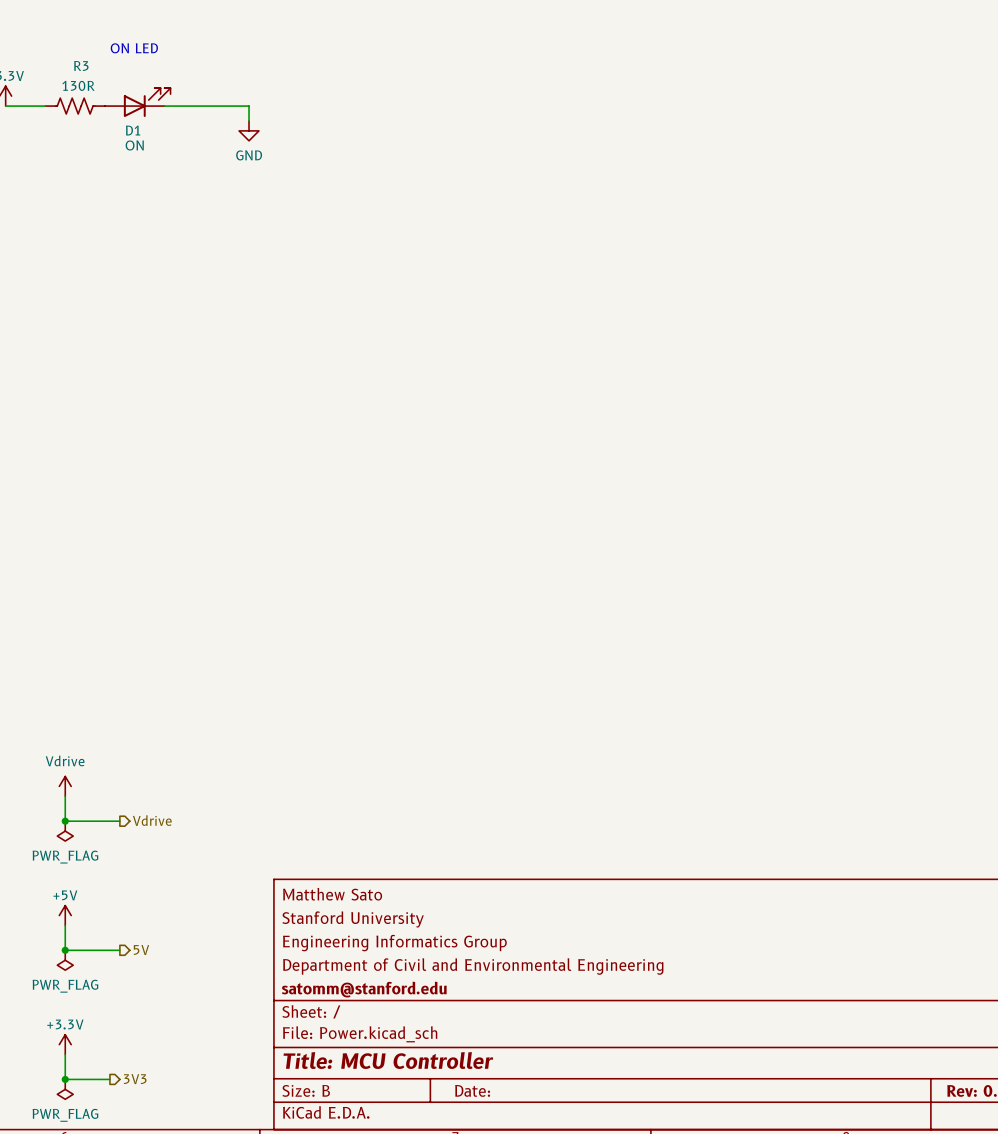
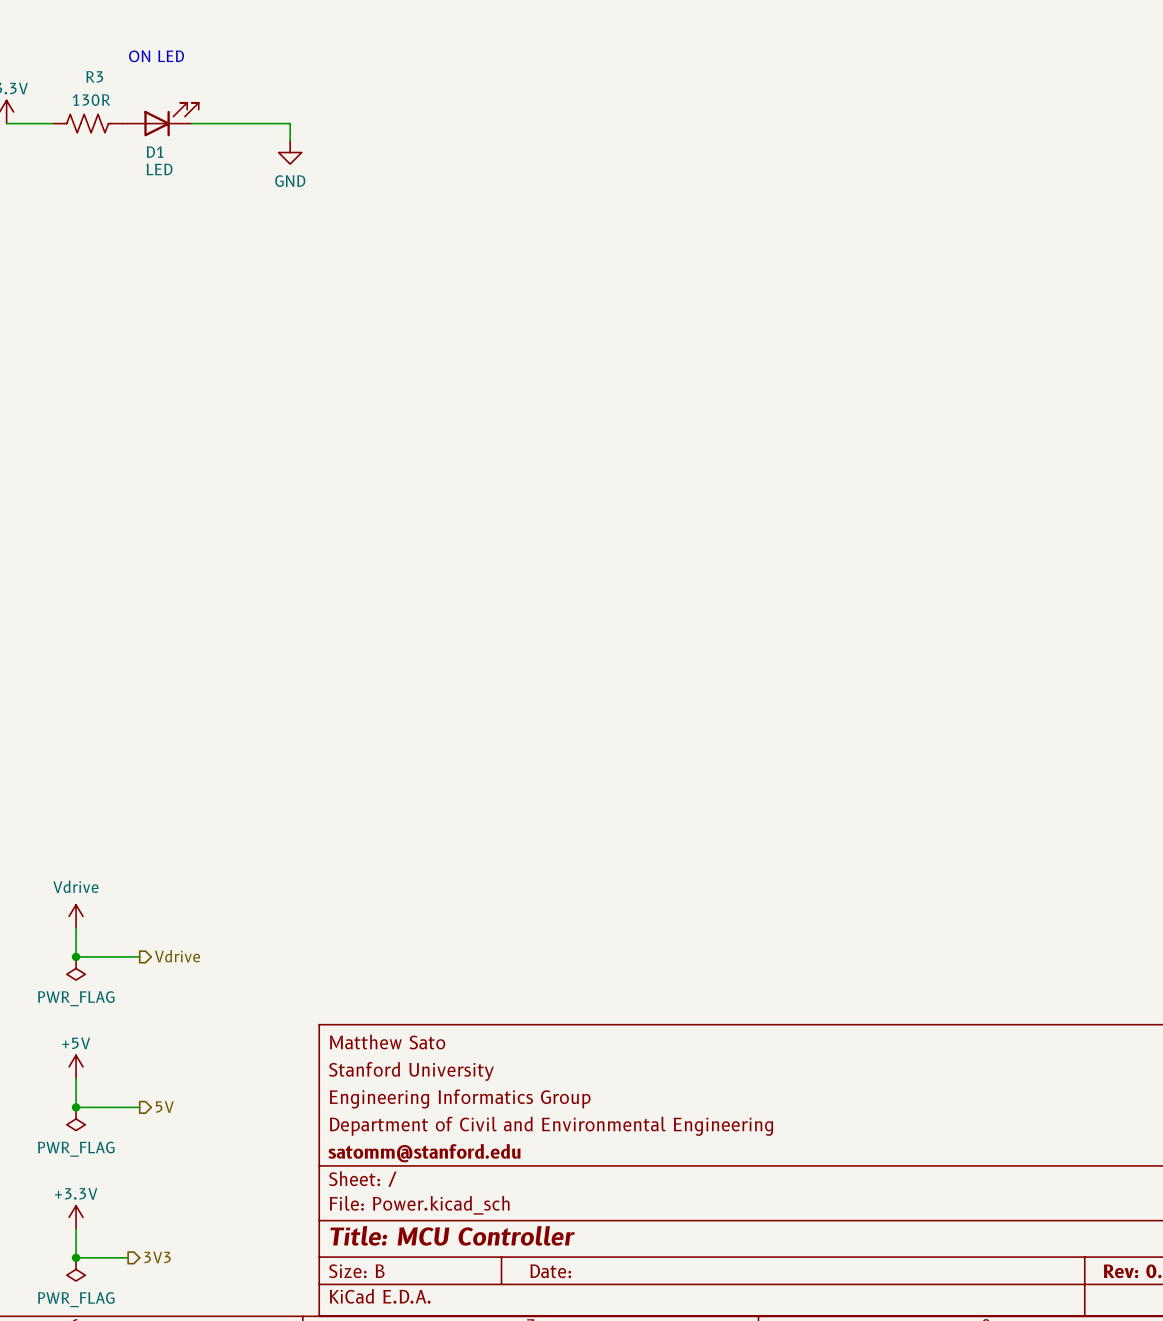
D1 value: ON (134, 145) -> LED (159, 169)

